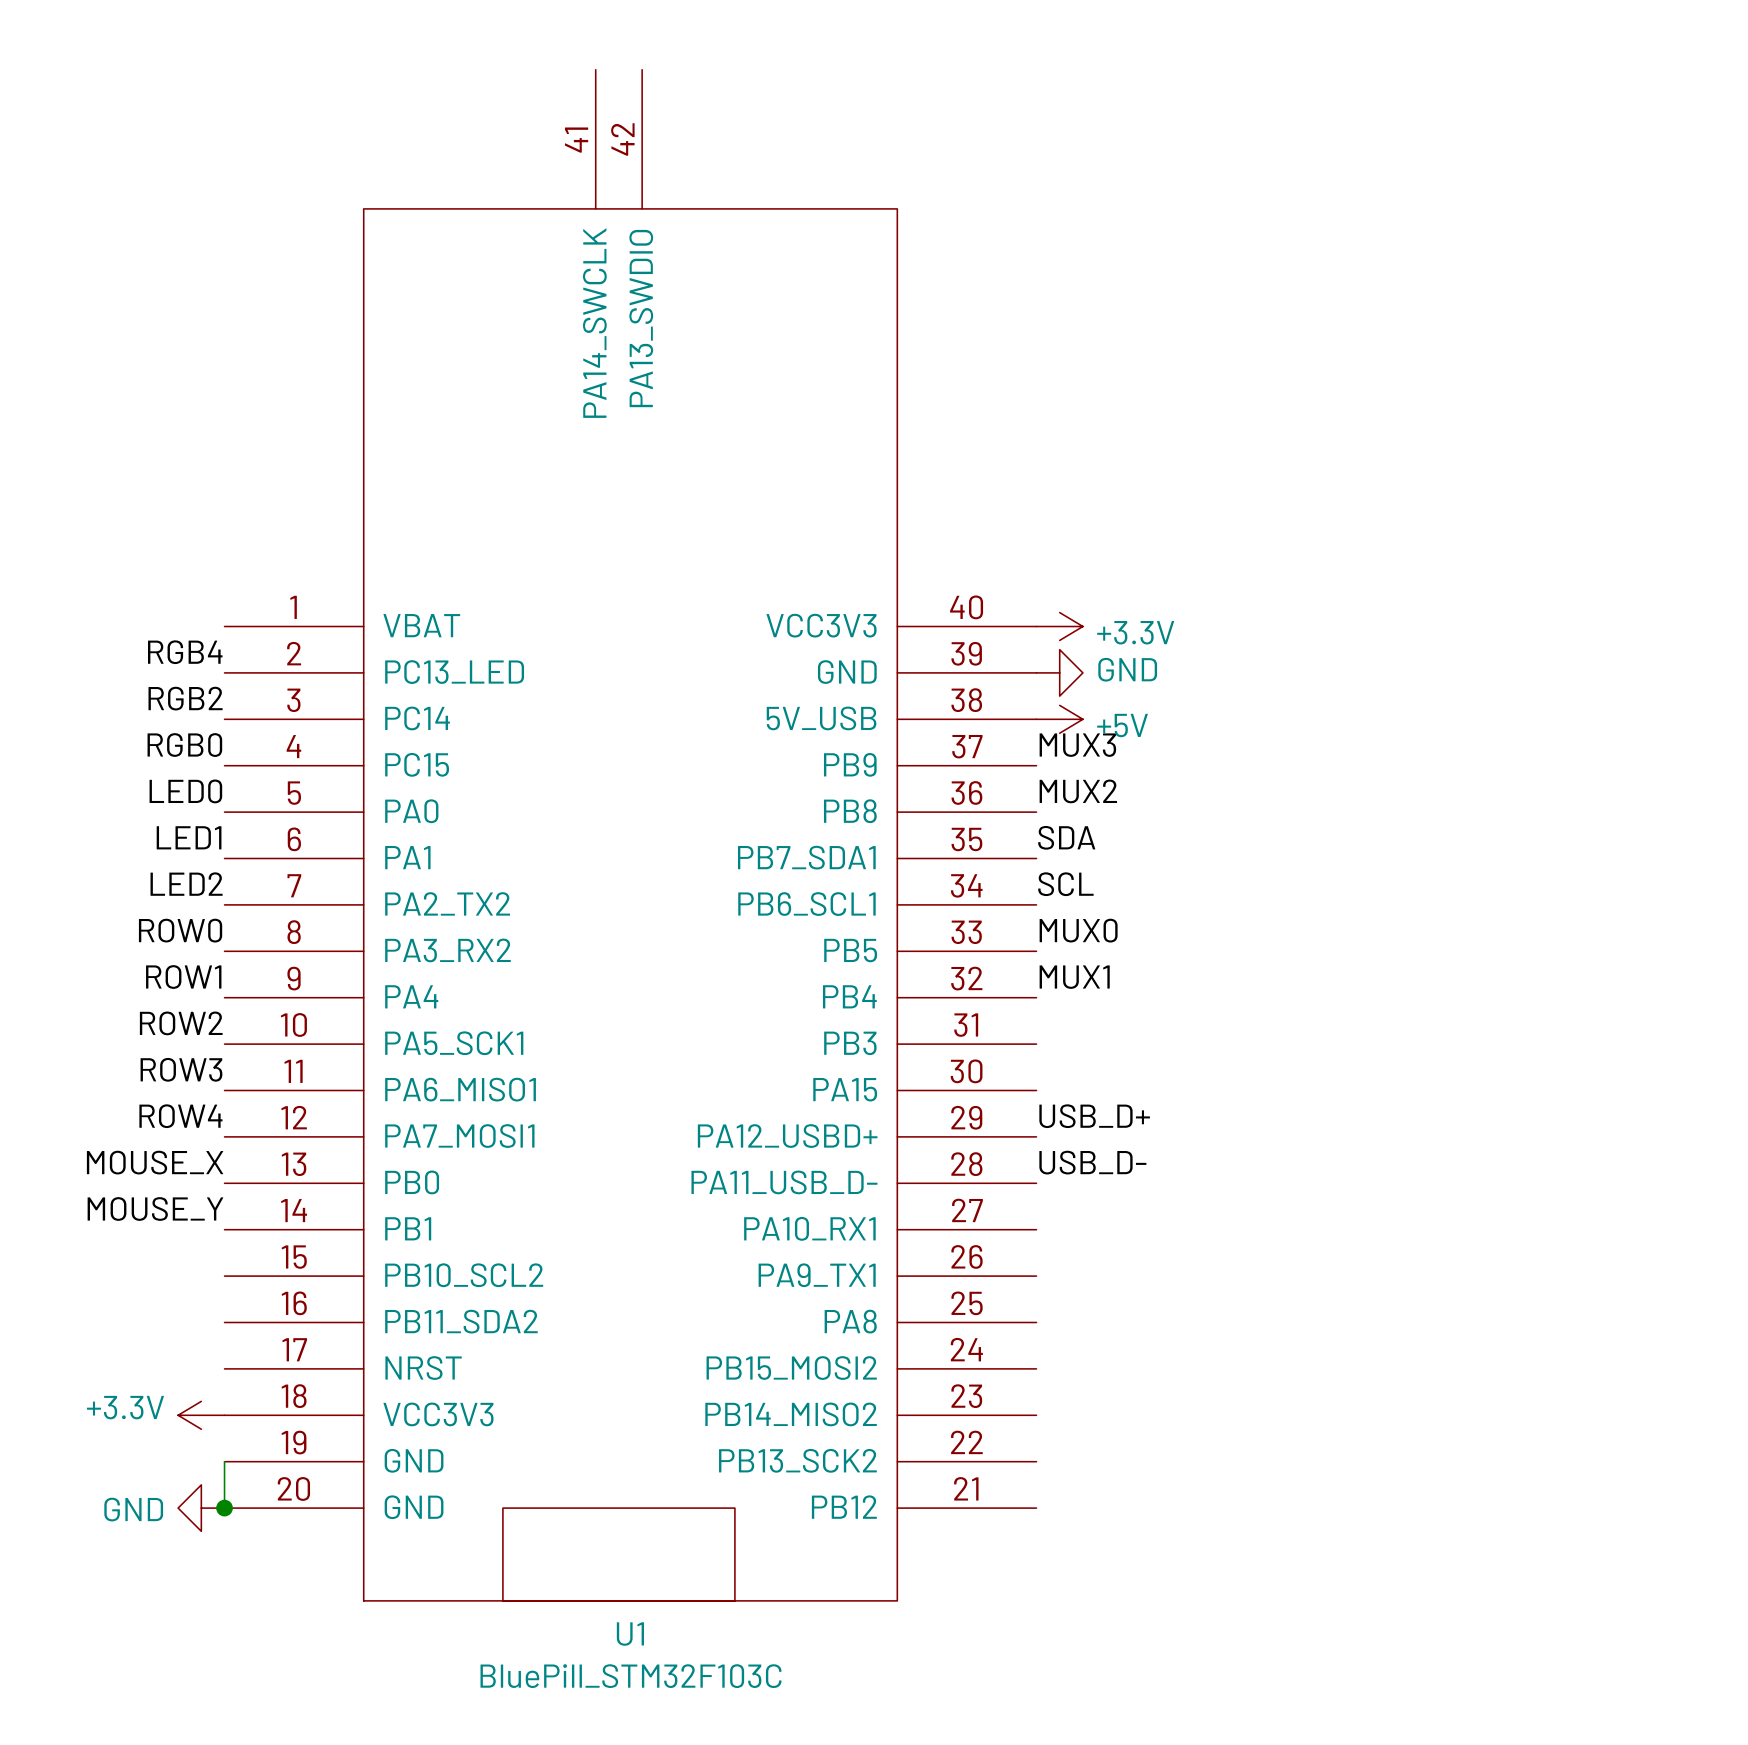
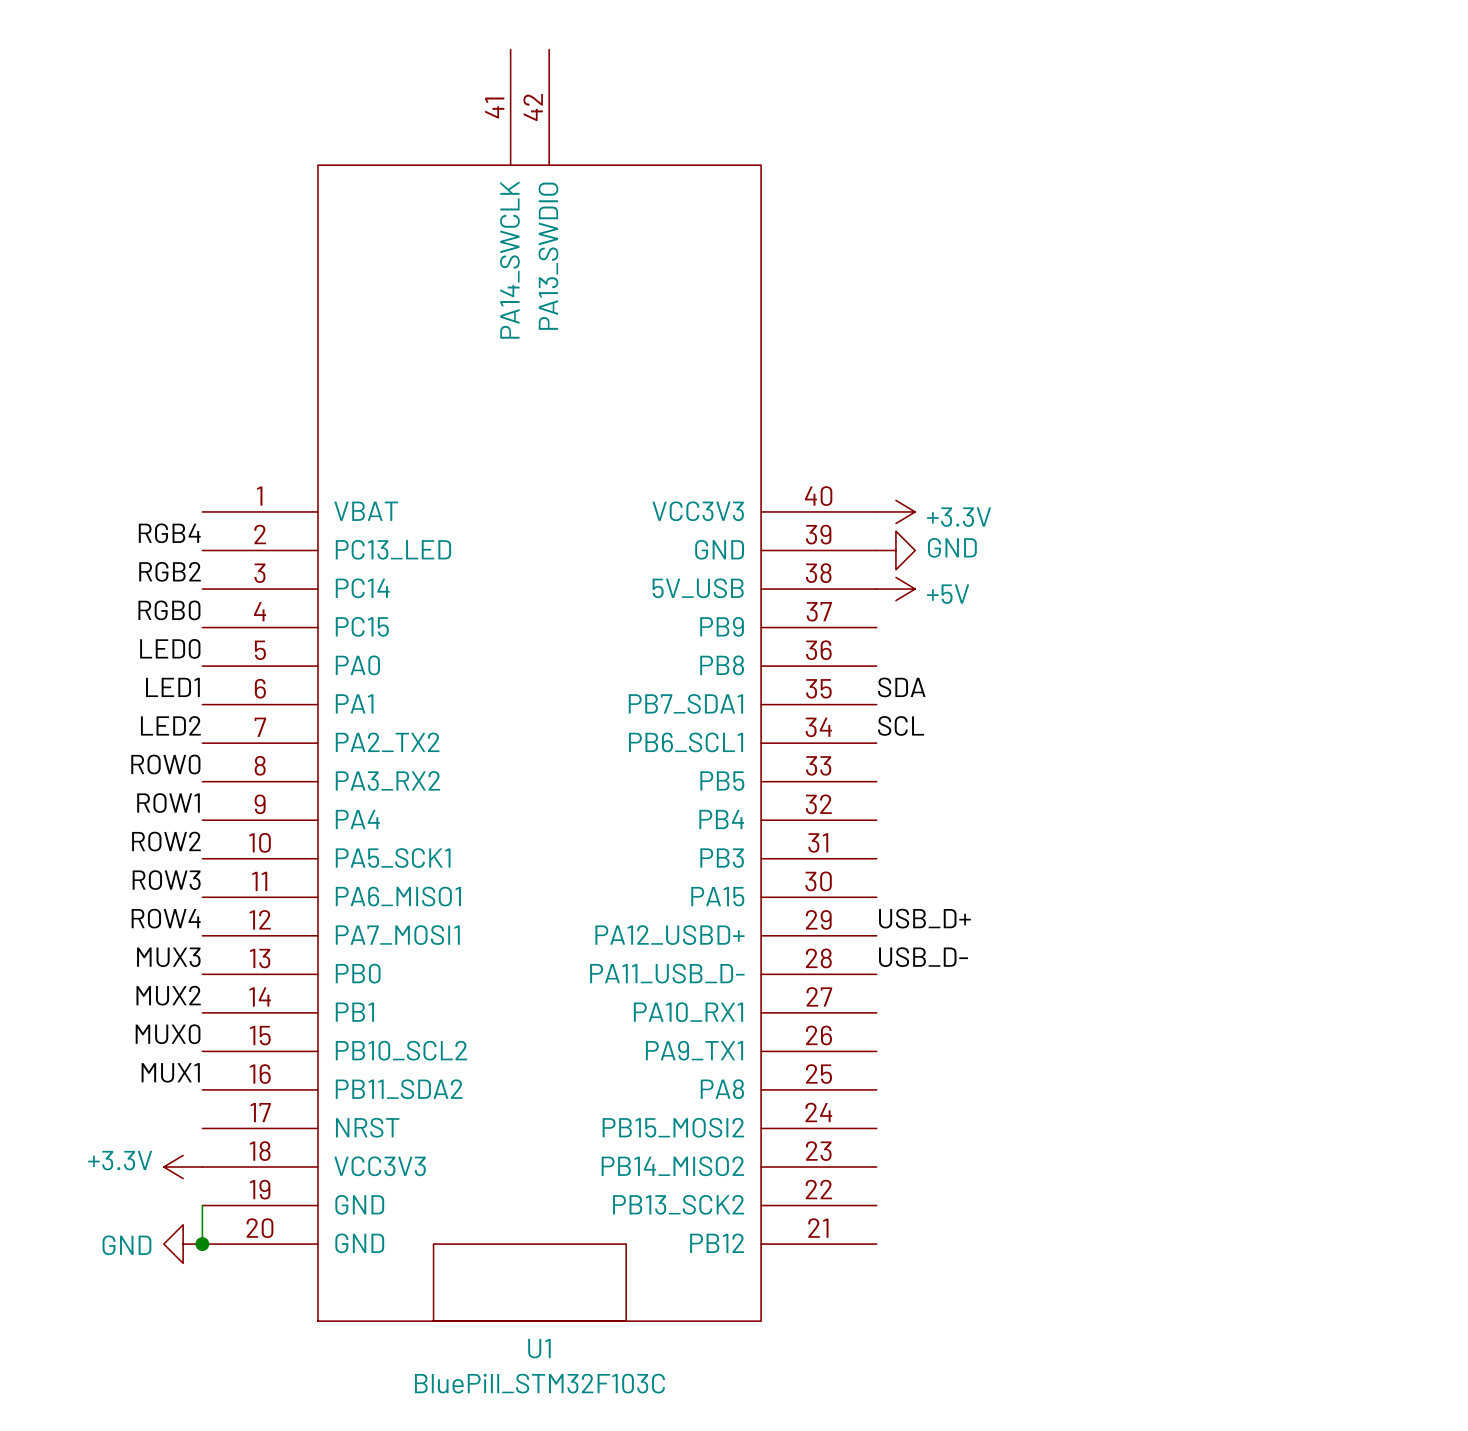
label: MUX3 (1077, 745) -> none
label: MUX2 (1078, 791) -> none
label: MUX0 (1078, 930) -> none
label: MUX1 (1074, 977) -> none
label: MOUSE_X (155, 1162) -> MUX3 (168, 957)
label: MOUSE_Y (155, 1208) -> MUX2 (168, 995)
label: none -> MUX0 (168, 1034)
label: none -> MUX1 (170, 1072)

